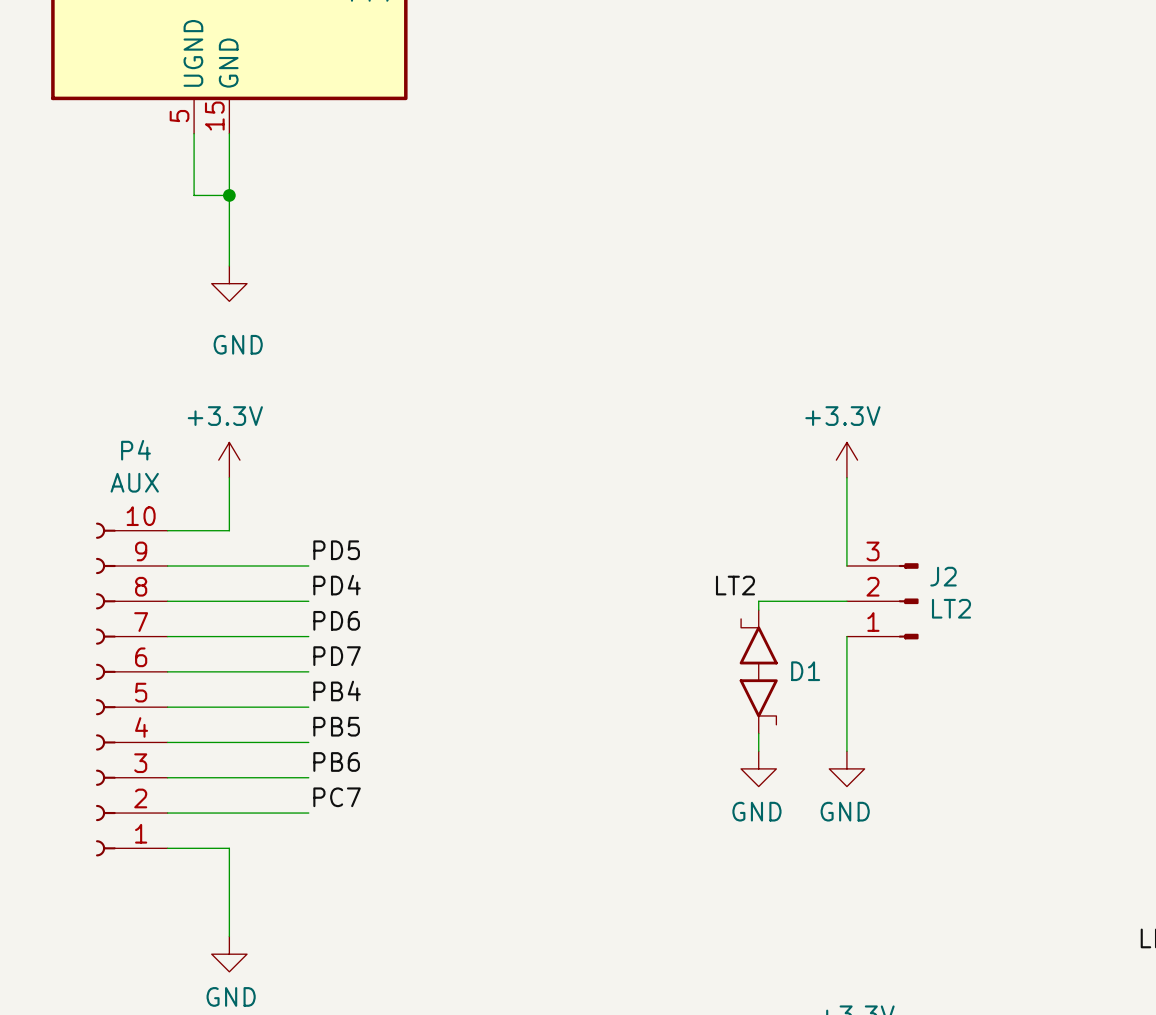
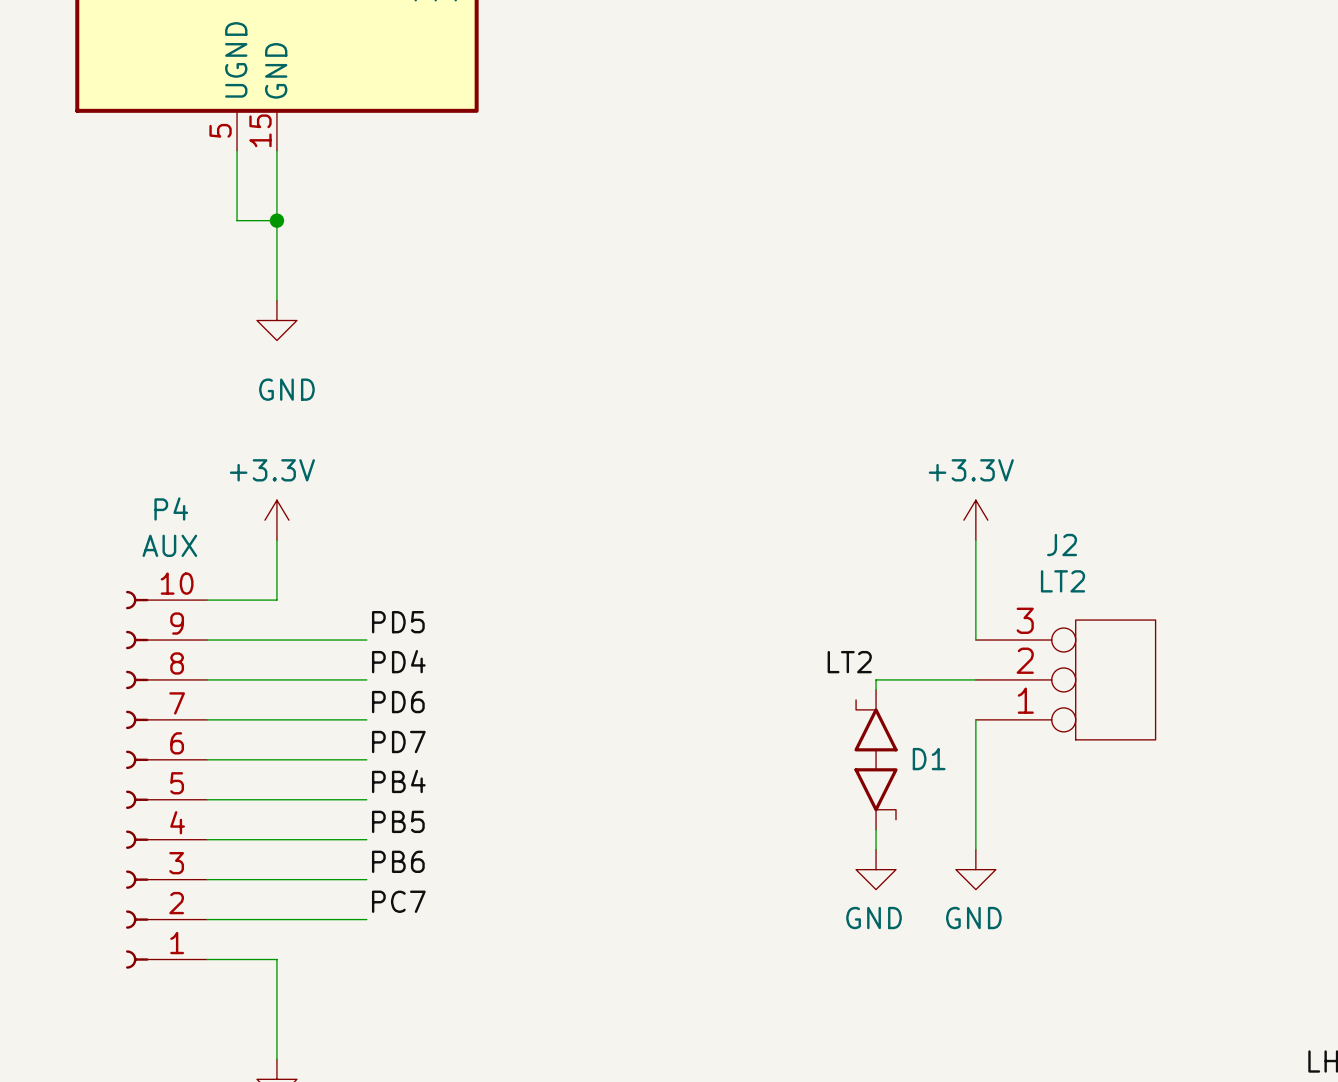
J2 symbol: [846, 563, 919, 640] -> [975, 620, 1156, 740]
J2 name position: J2 (943, 576) -> J2 (1062, 545)
J2 value position: LT2 (951, 608) -> LT2 (1063, 581)

